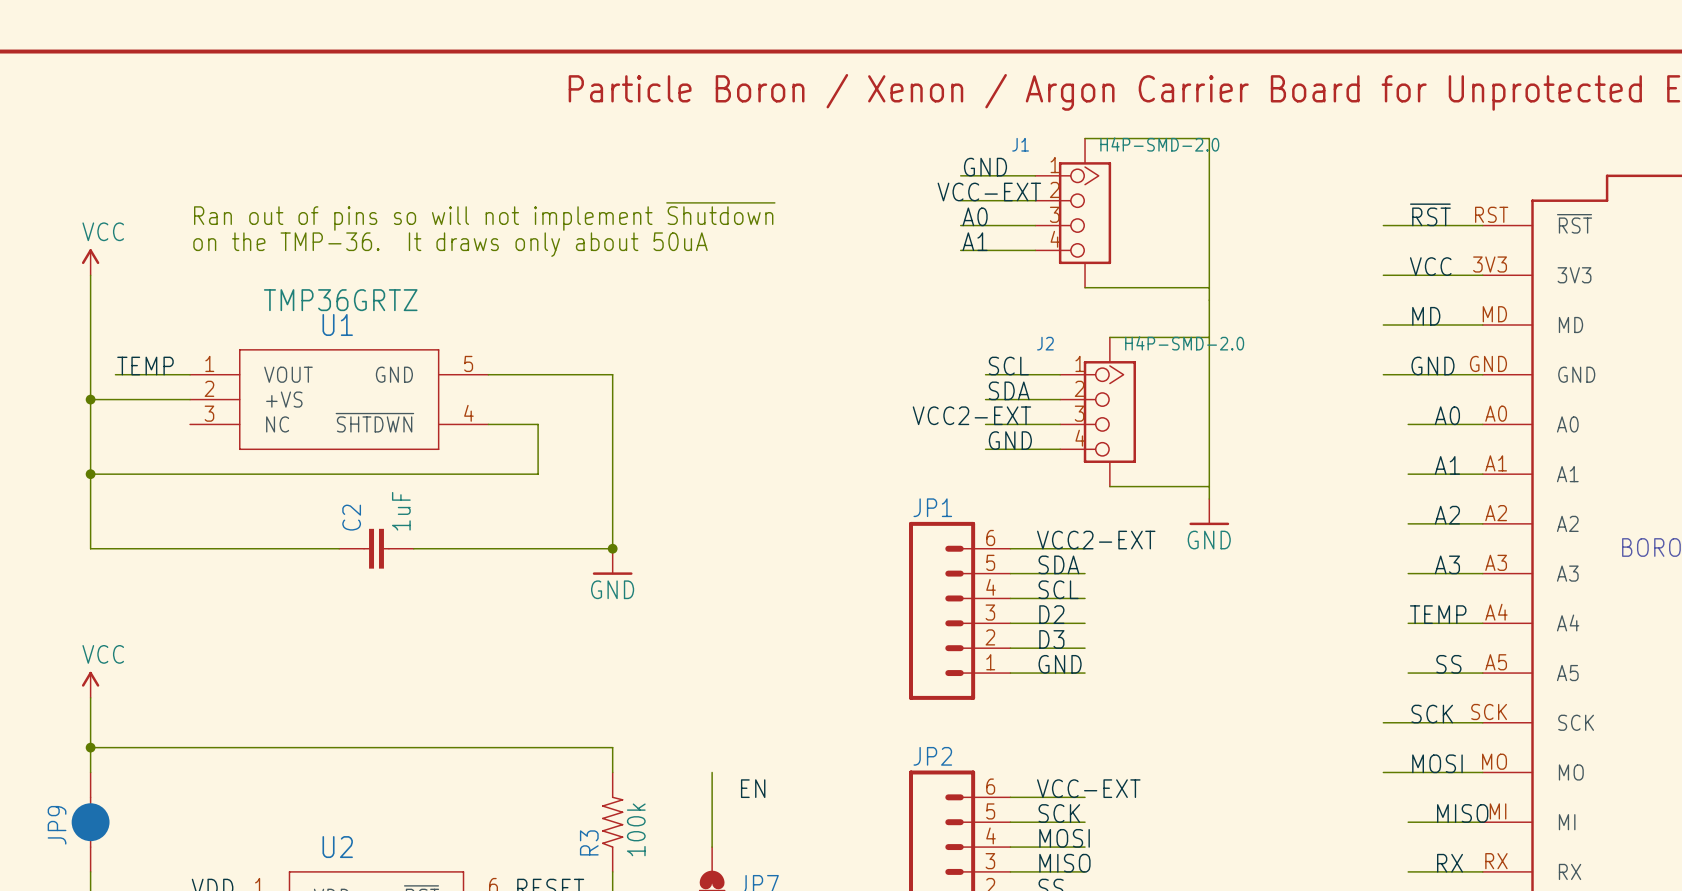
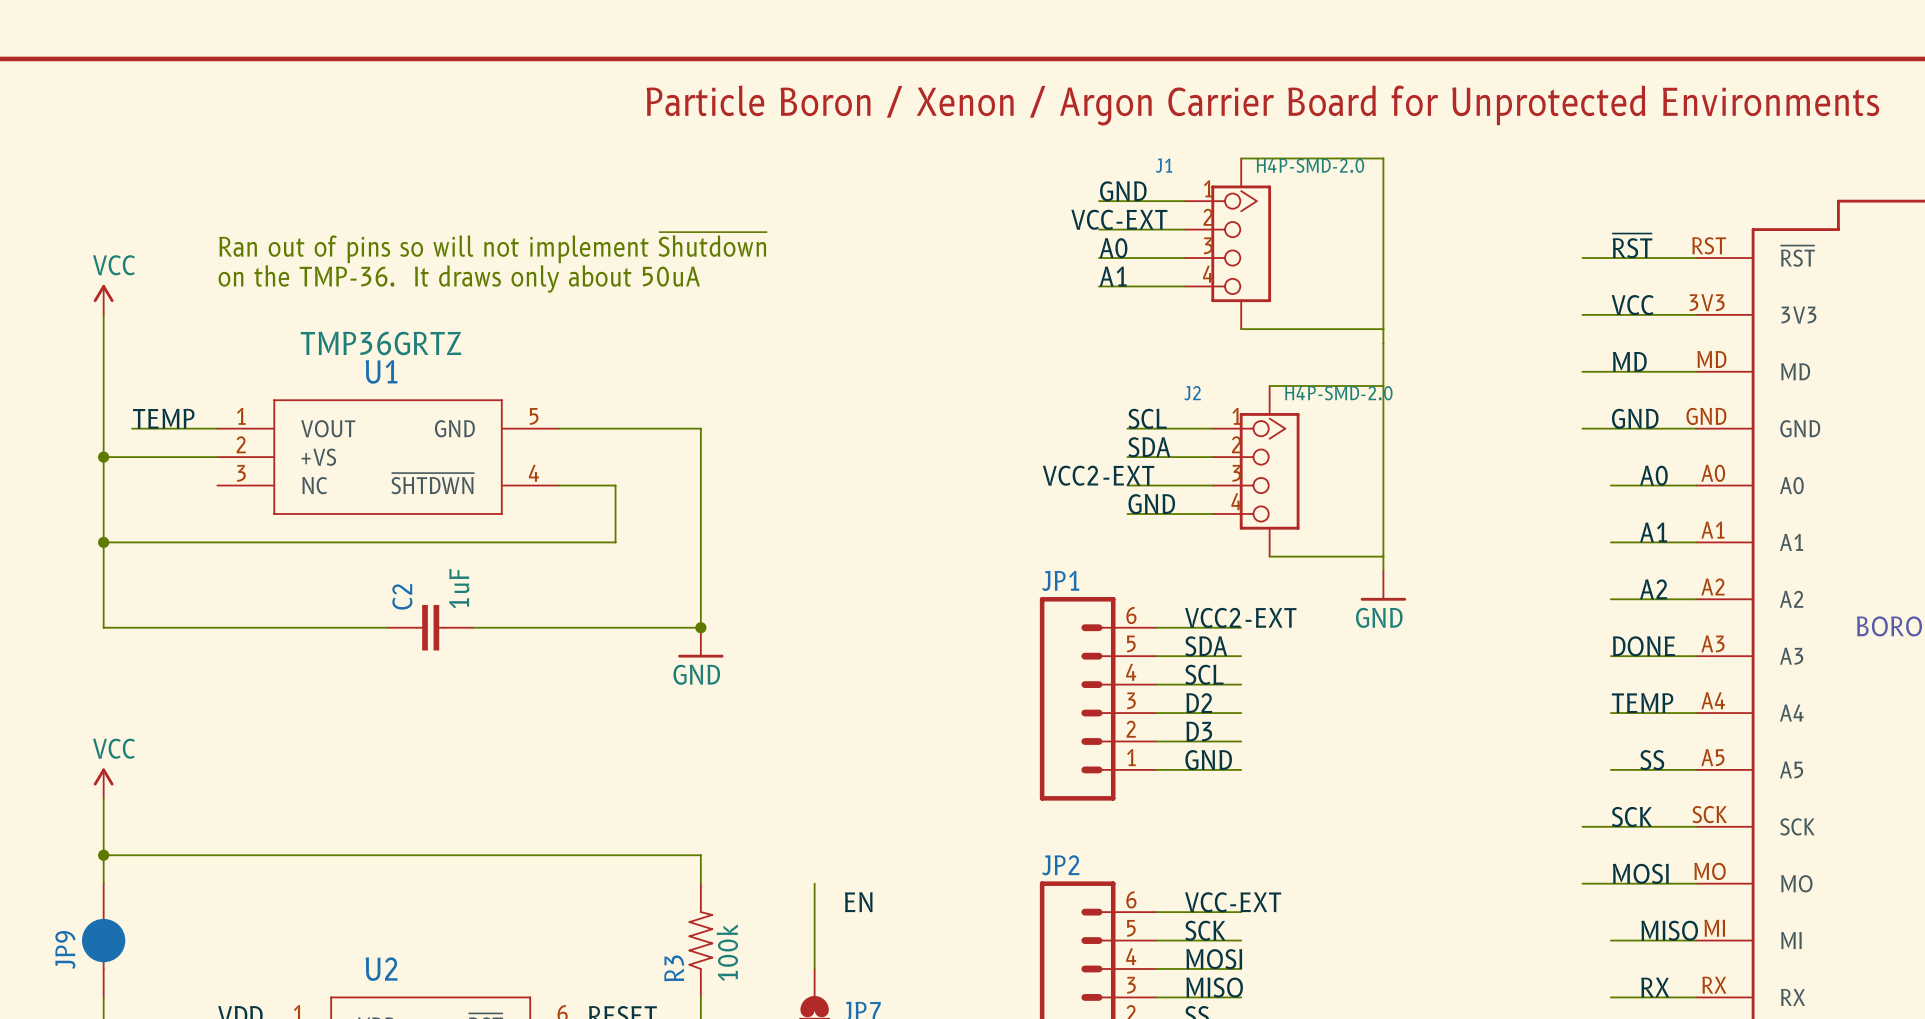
label: none -> DONE (1643, 646)
label: A3 (1447, 564) -> none

